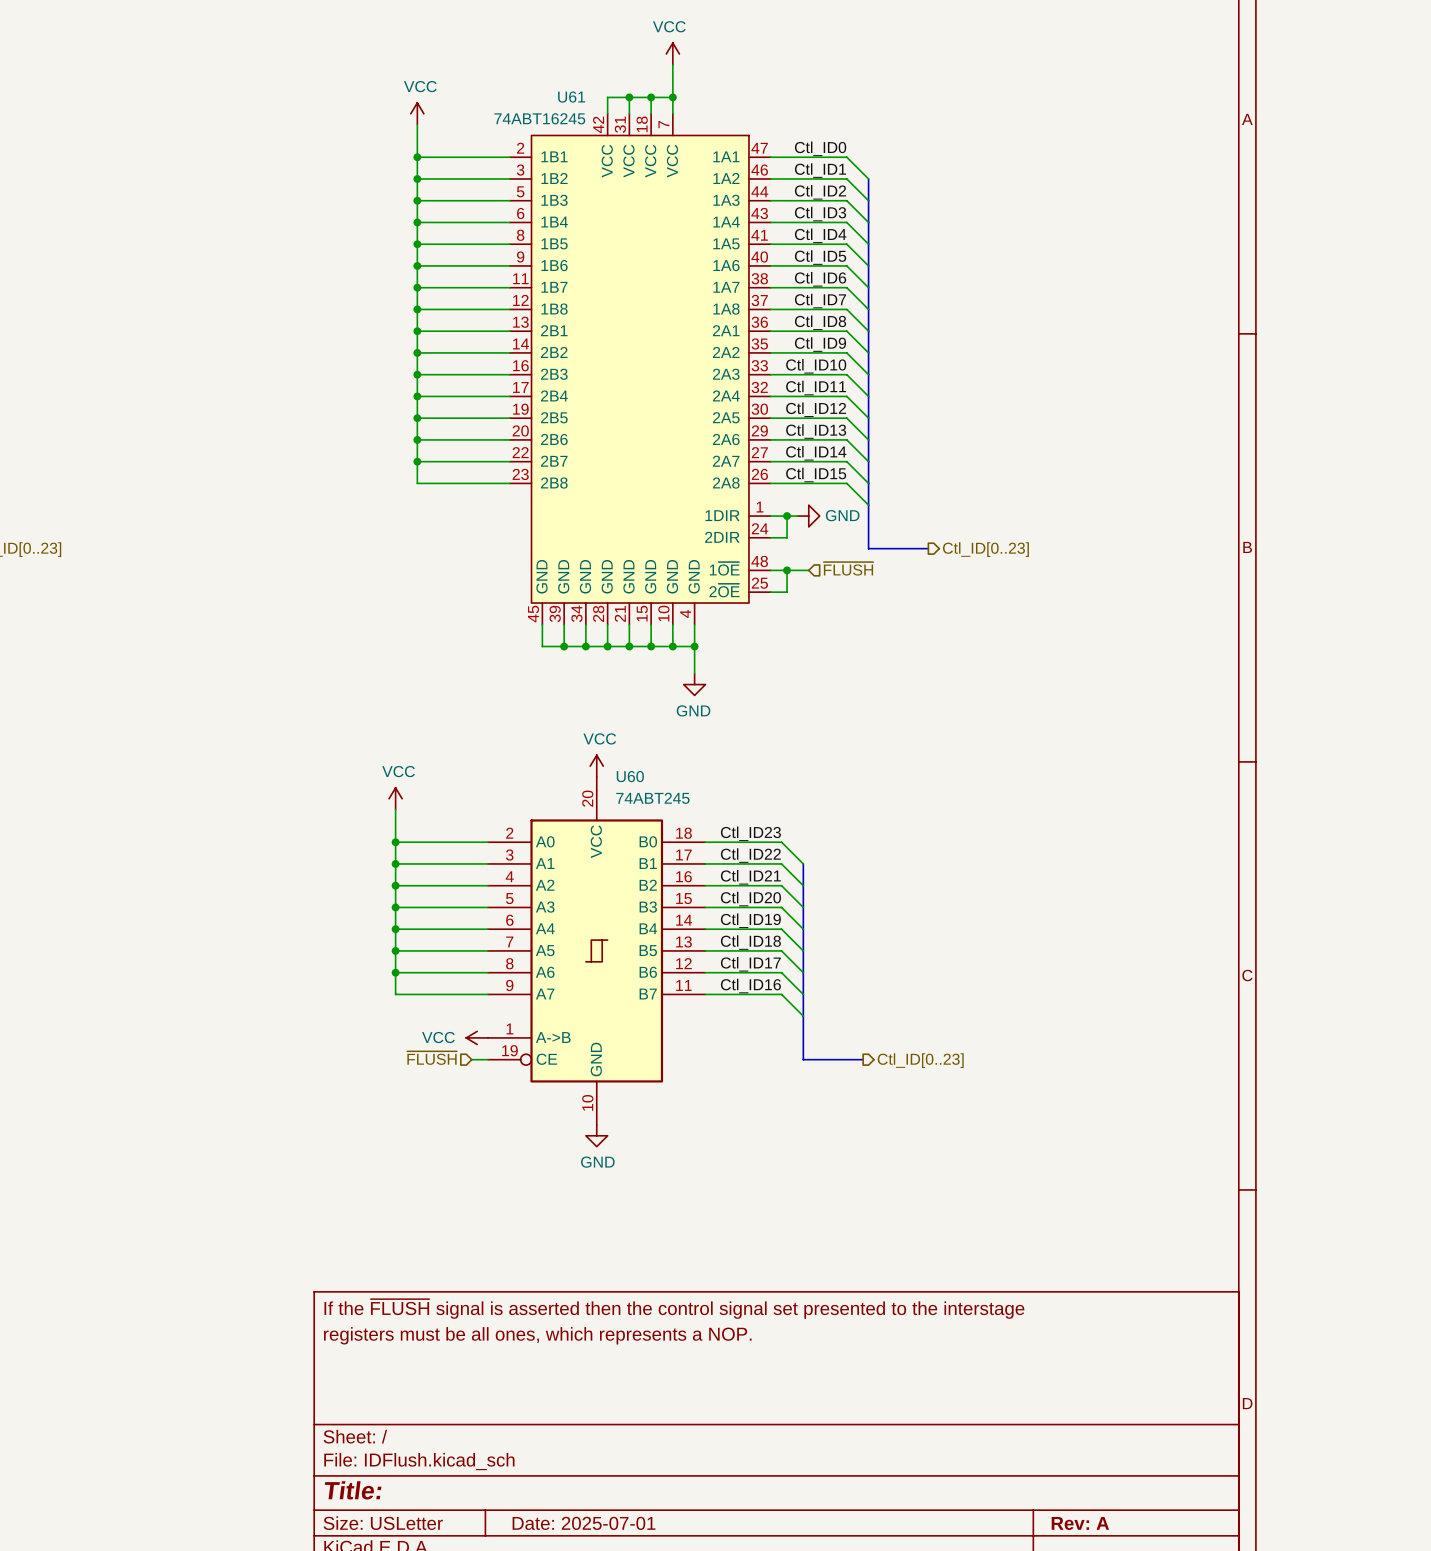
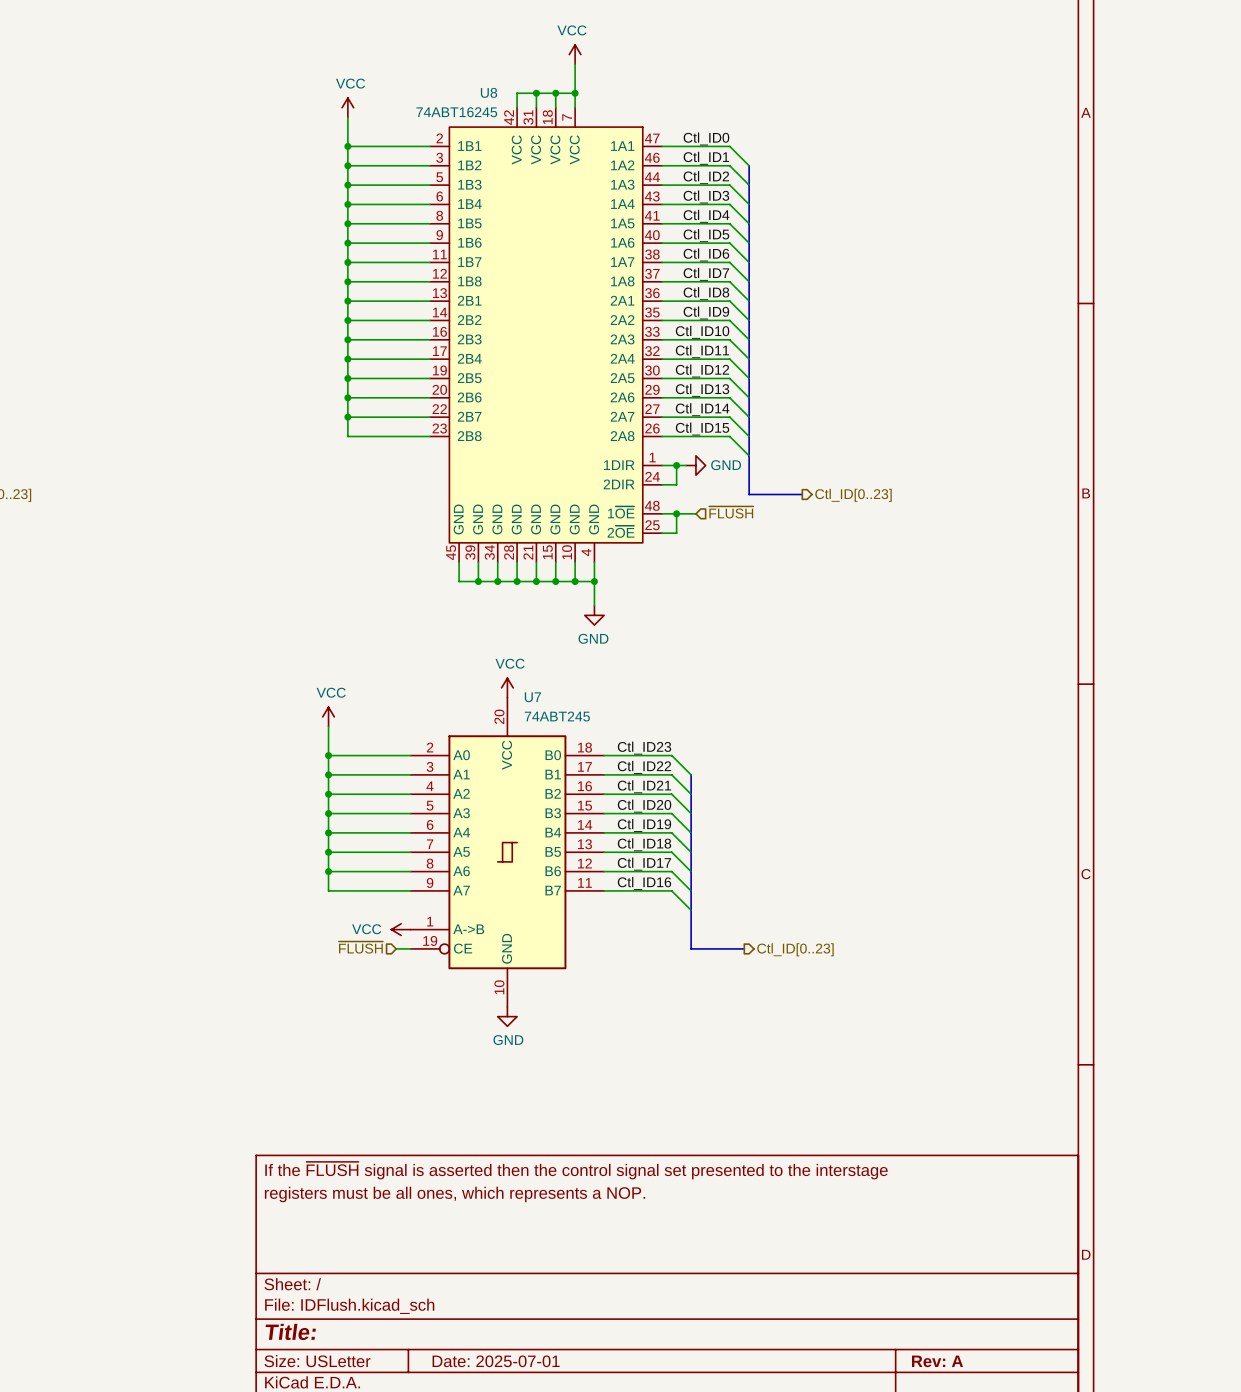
U61 name: U61 (571, 97) -> U8 (489, 92)
U60 name: U60 (630, 776) -> U7 (532, 697)

